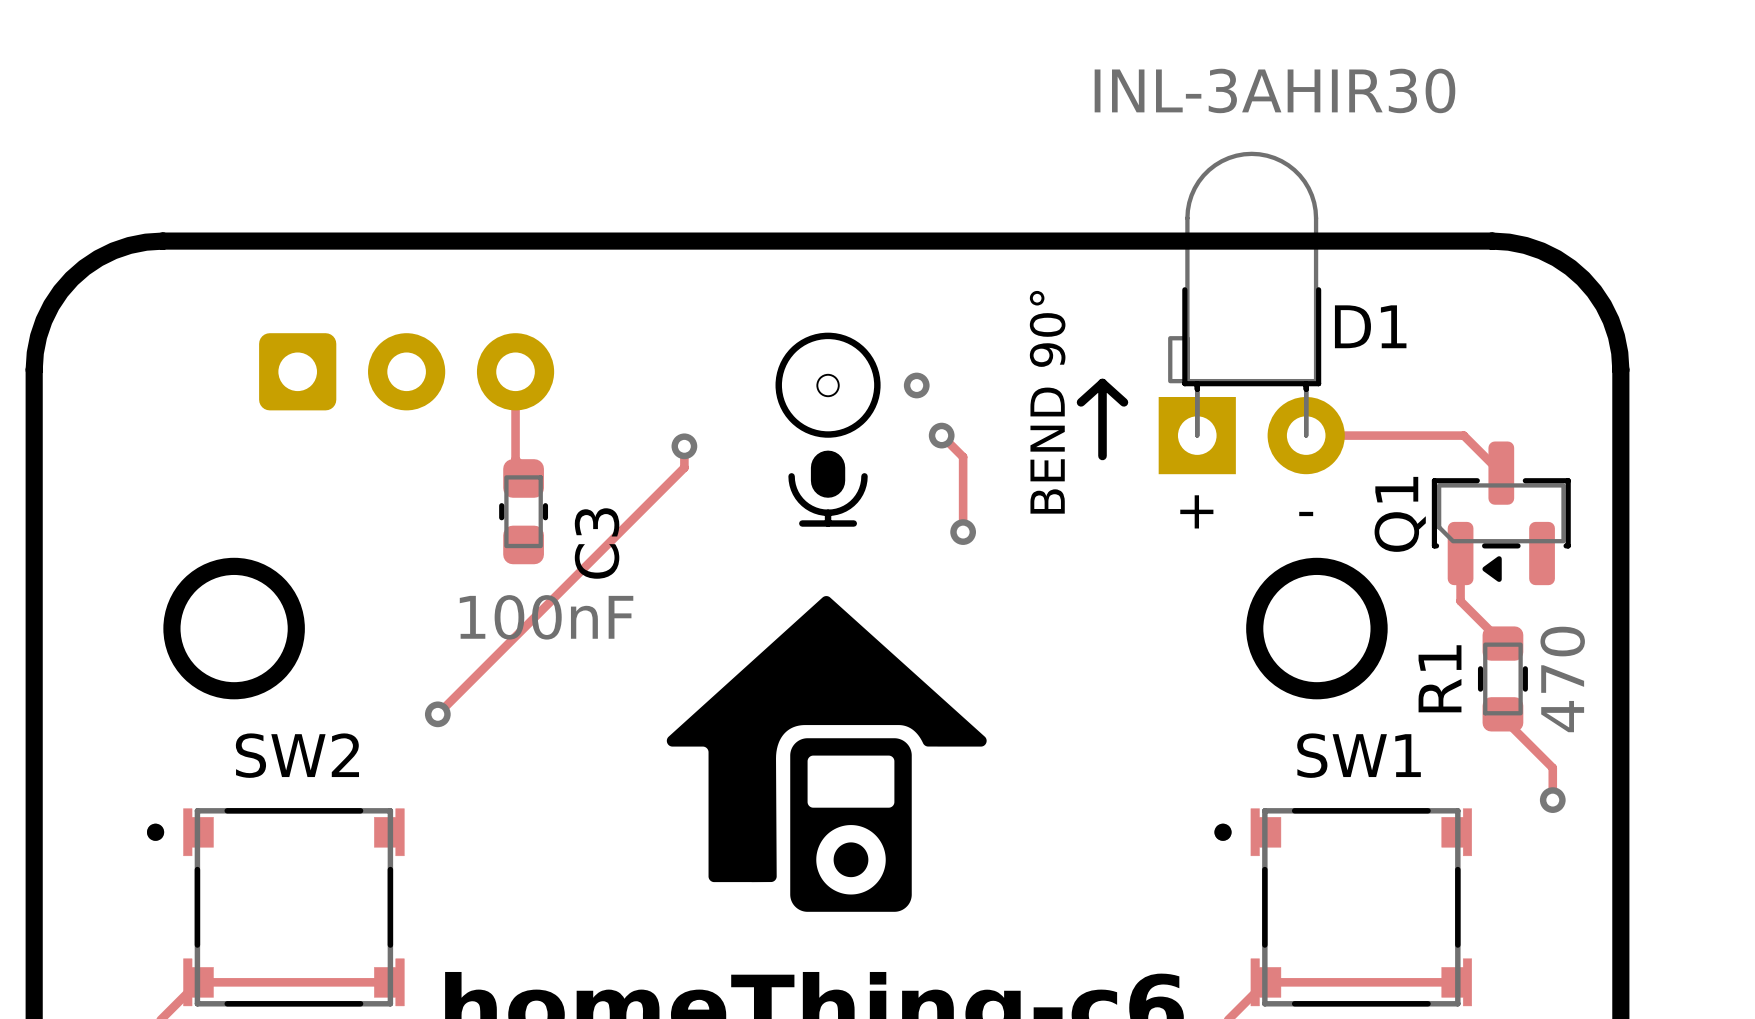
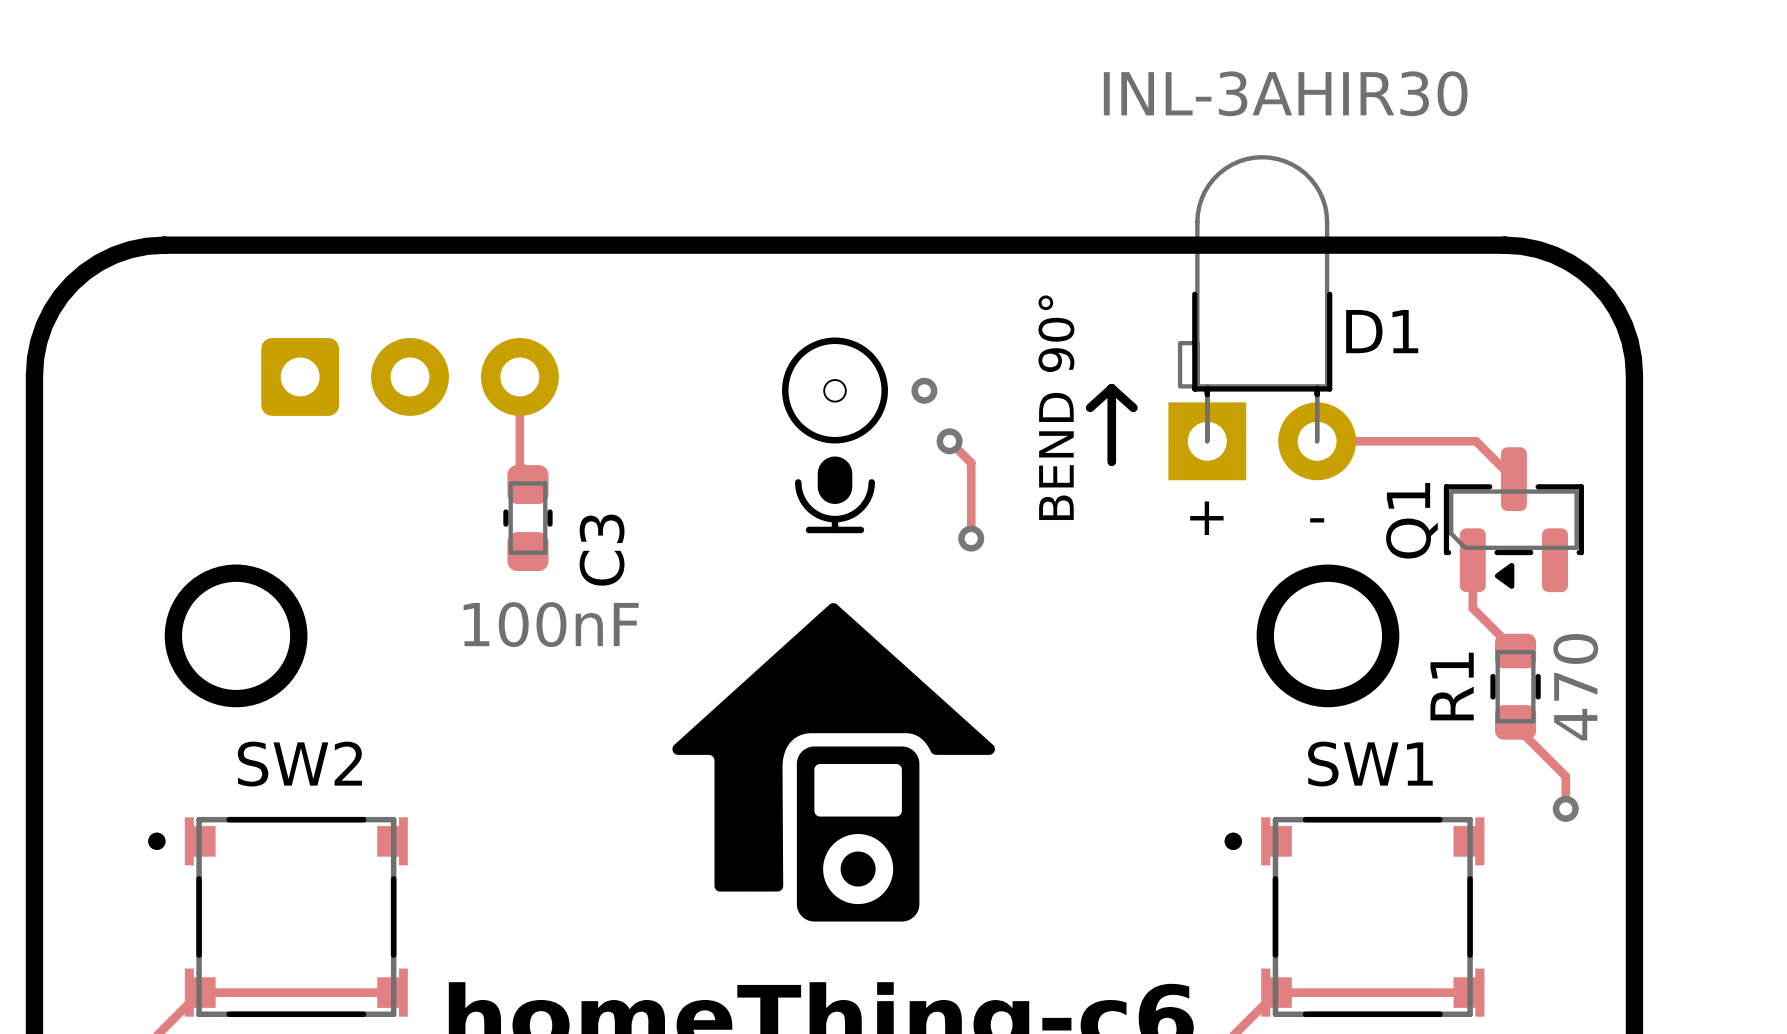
track: (684, 446) (684, 467) (437, 714) -> none
via: (684, 446) -> none
via: (437, 714) -> none

